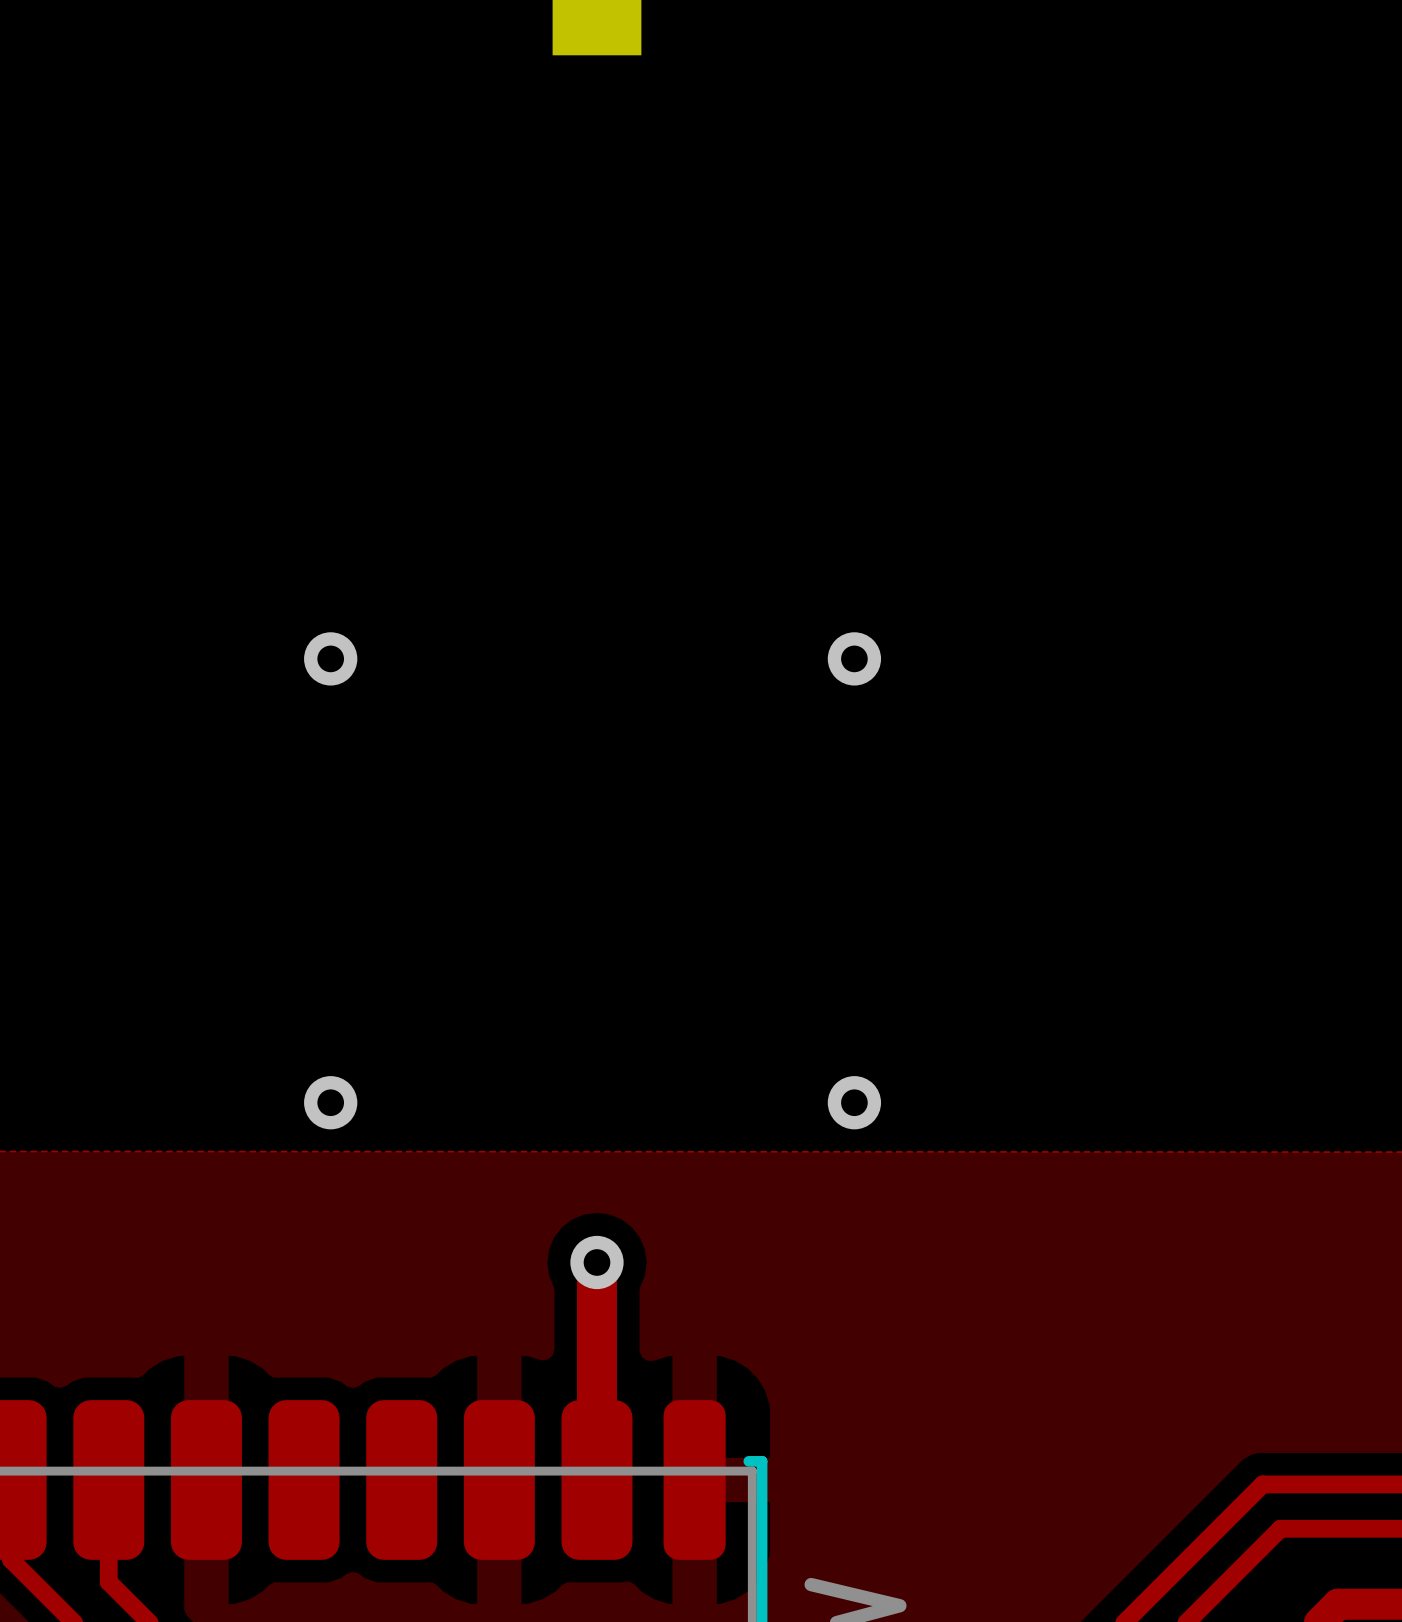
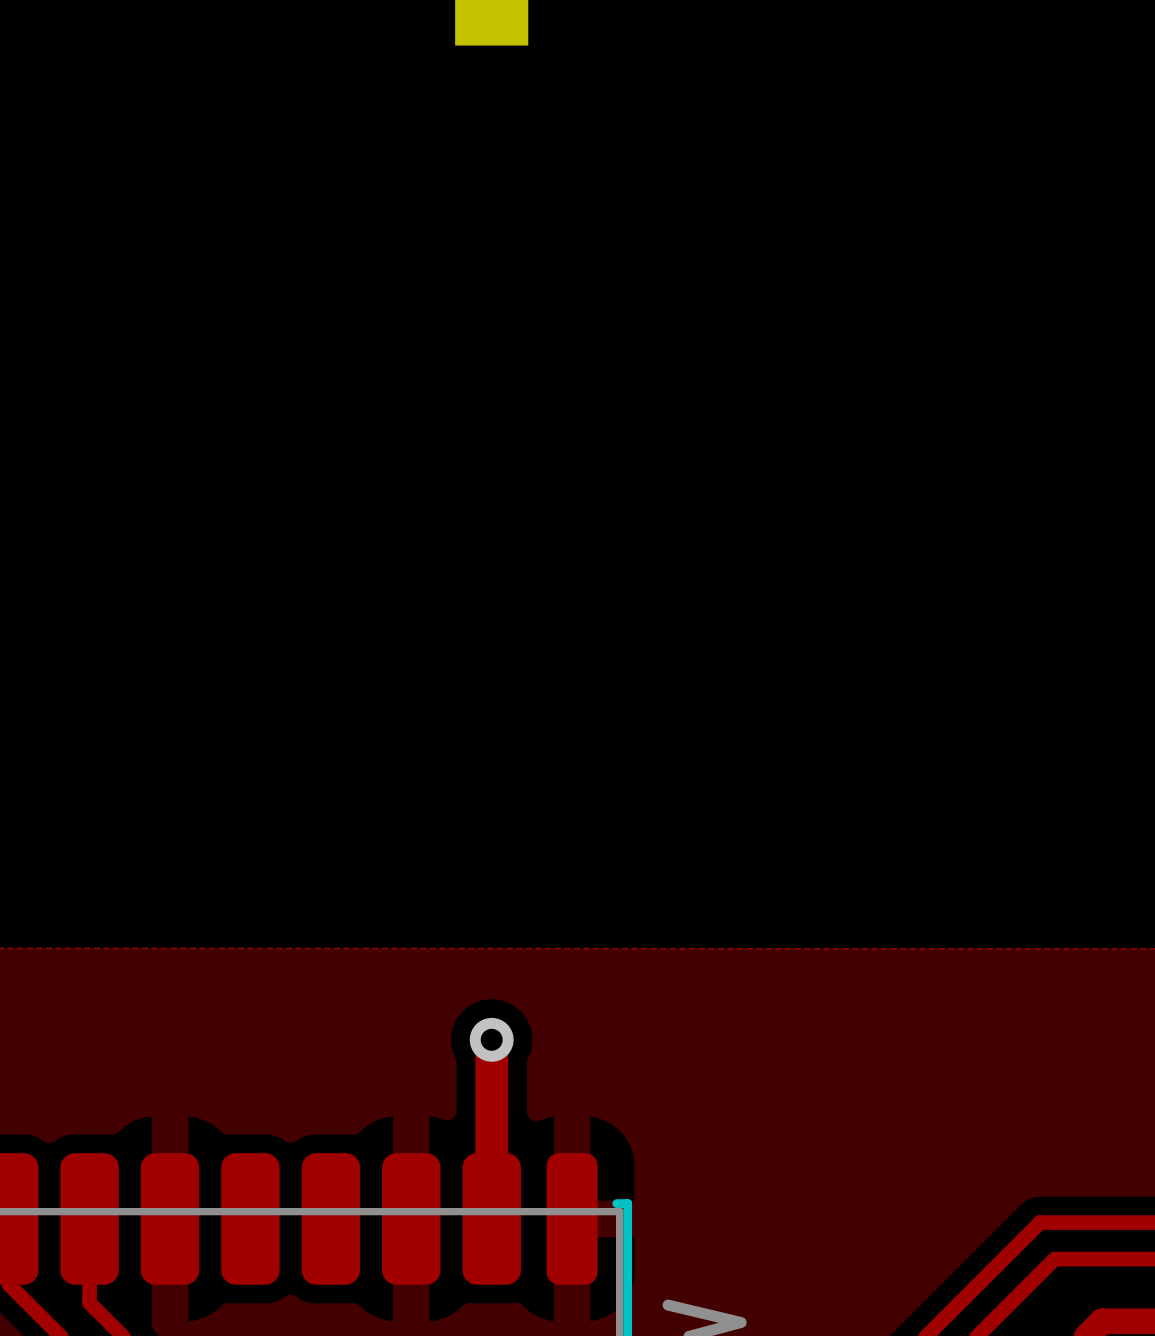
via: (330, 658) -> none
via: (854, 658) -> none
via: (330, 1102) -> none
via: (854, 1102) -> none

